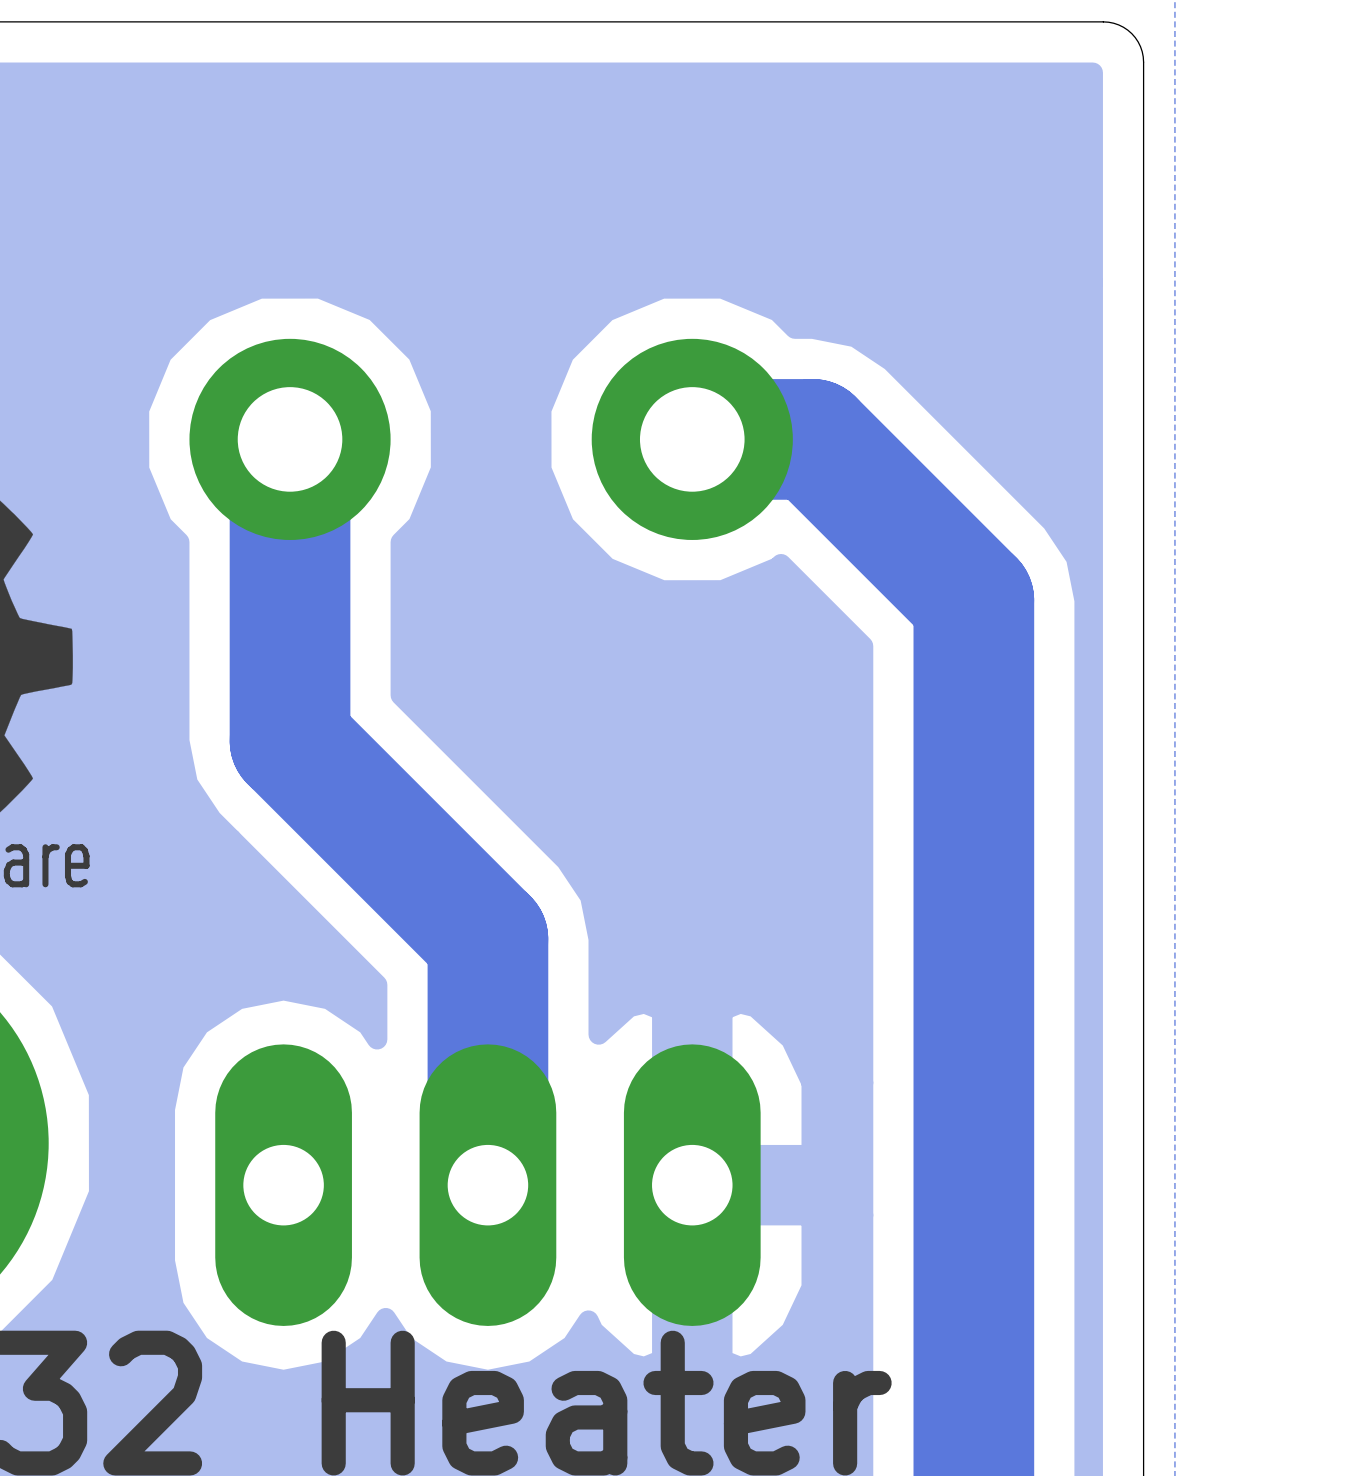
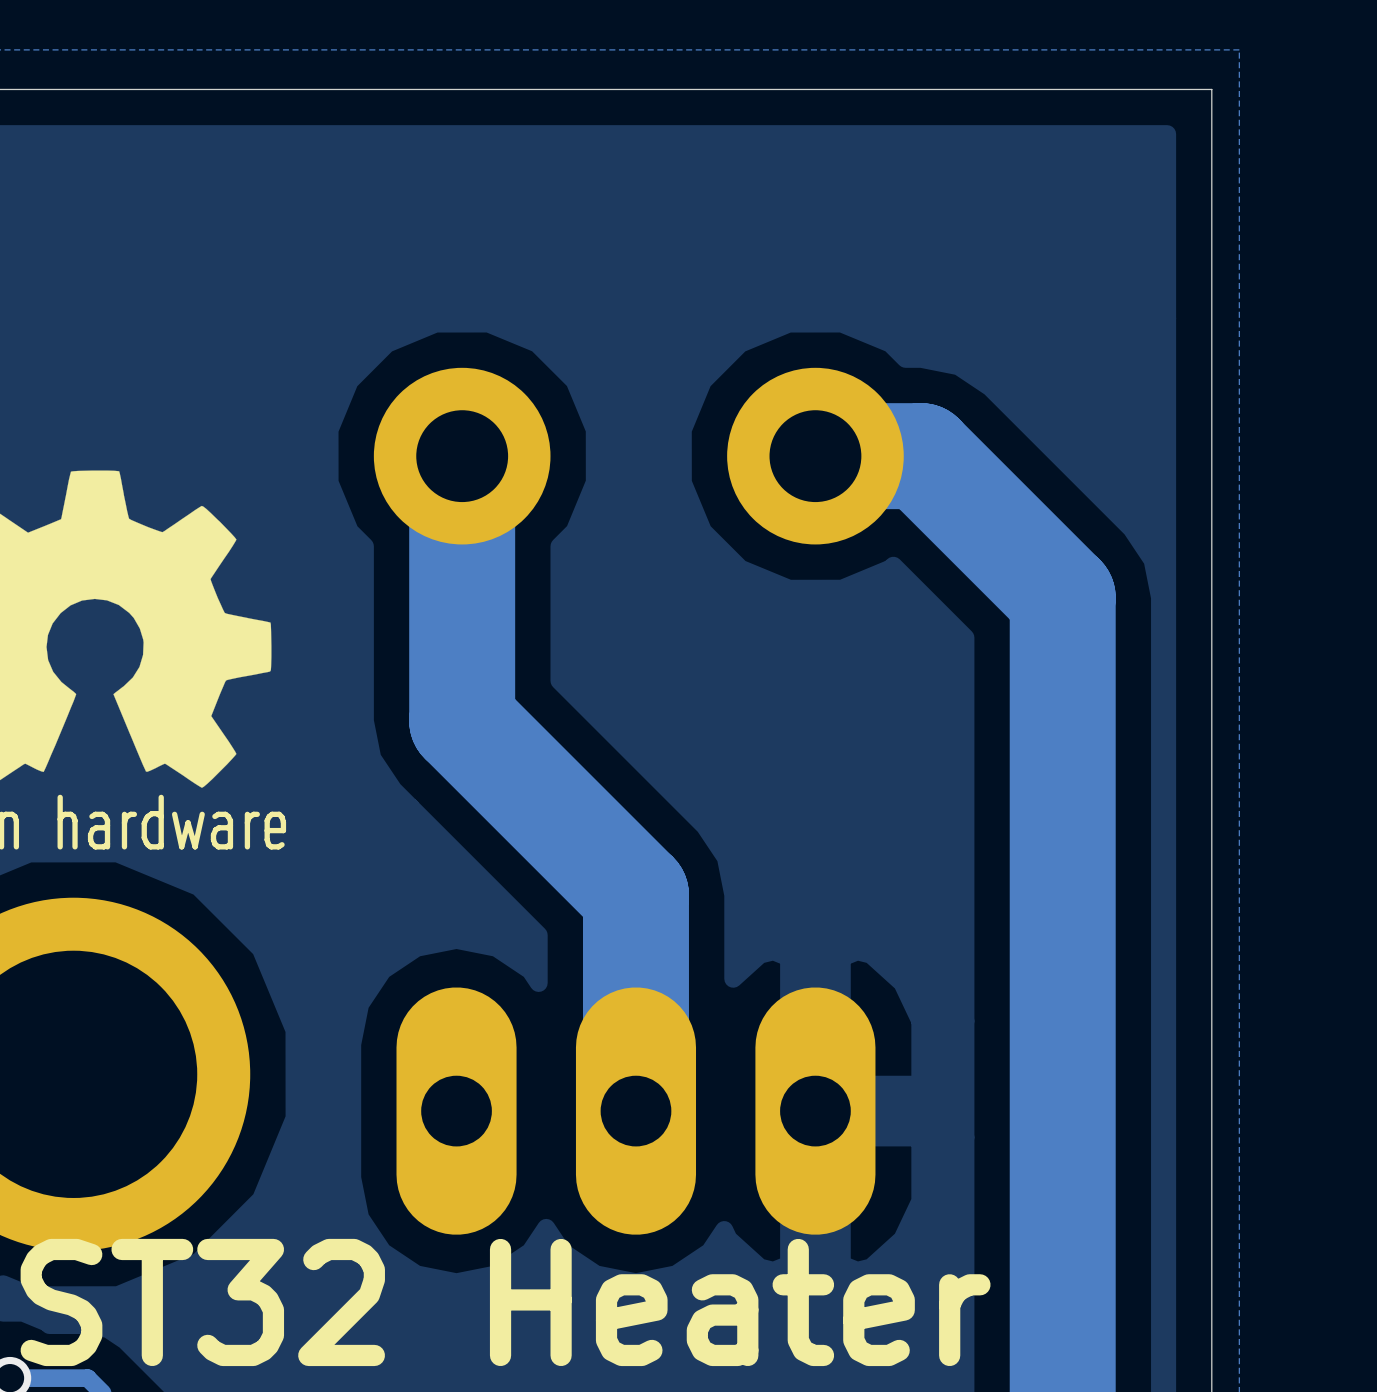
board edge: (1103, 21) (1118, 24) (1131, 33) (1140, 46) (1143, 62) -> (1176, 89) (1211, 89) (1211, 124)

